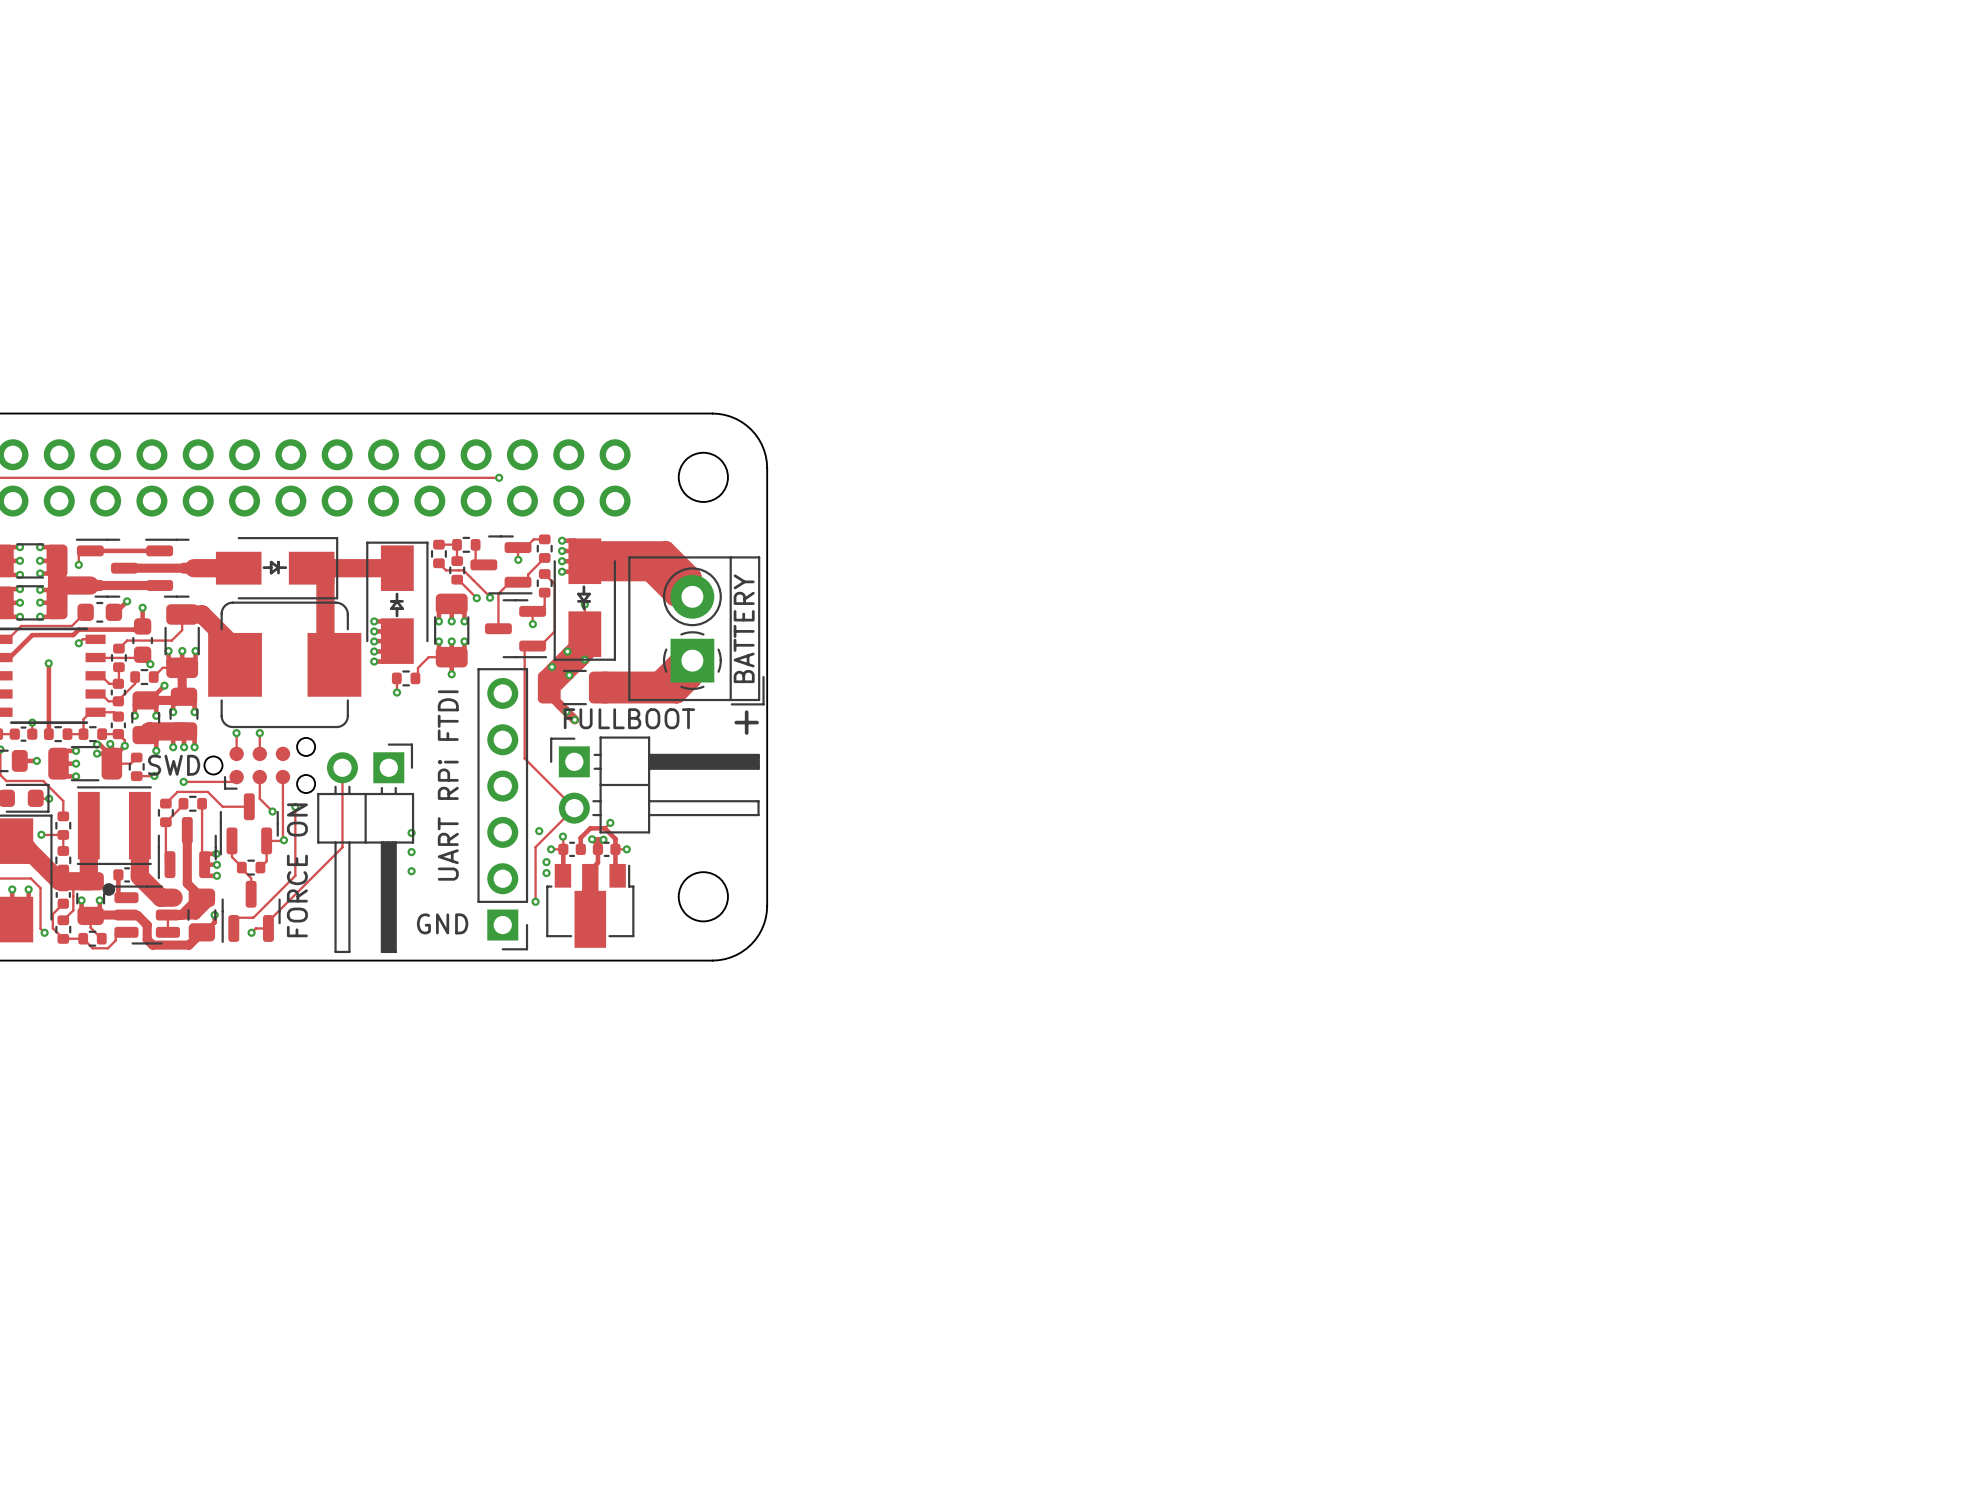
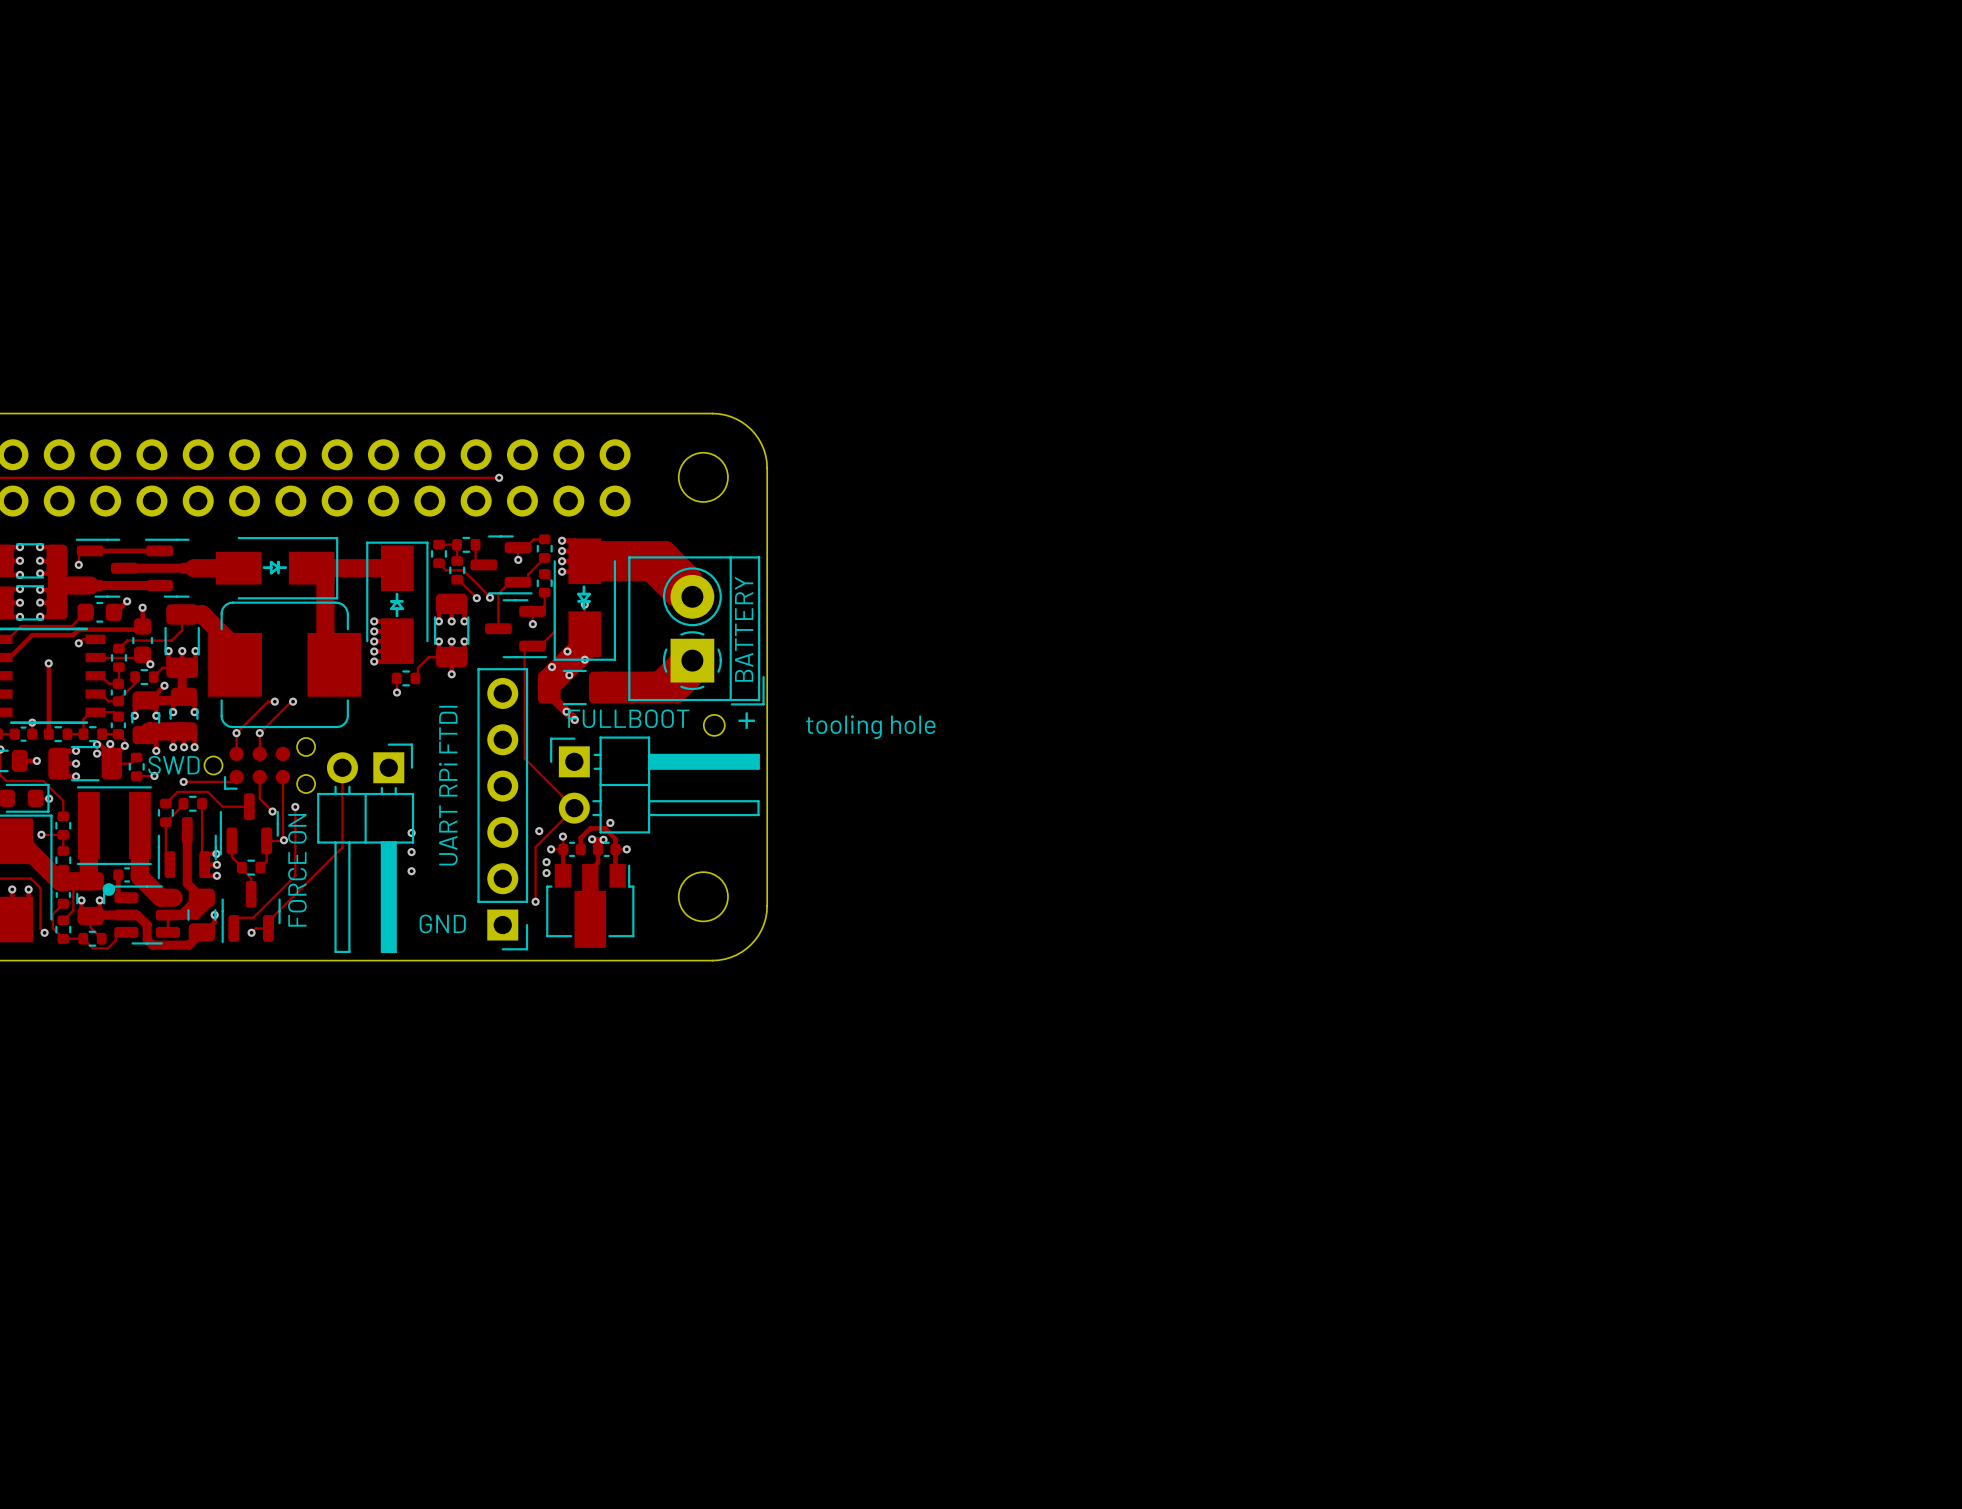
track: none -> (274, 701) (267, 701) (236, 733)
via: none -> (274, 701)
track: none -> (293, 701) (259, 733)
via: none -> (293, 701)
part: none -> (714, 725)

